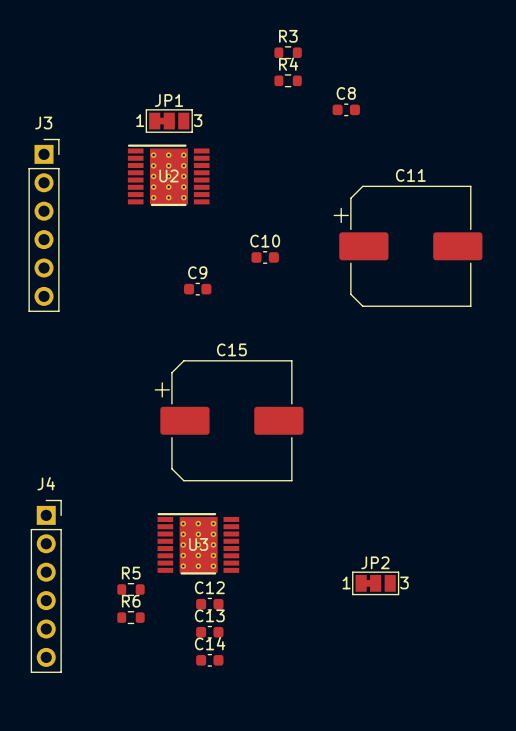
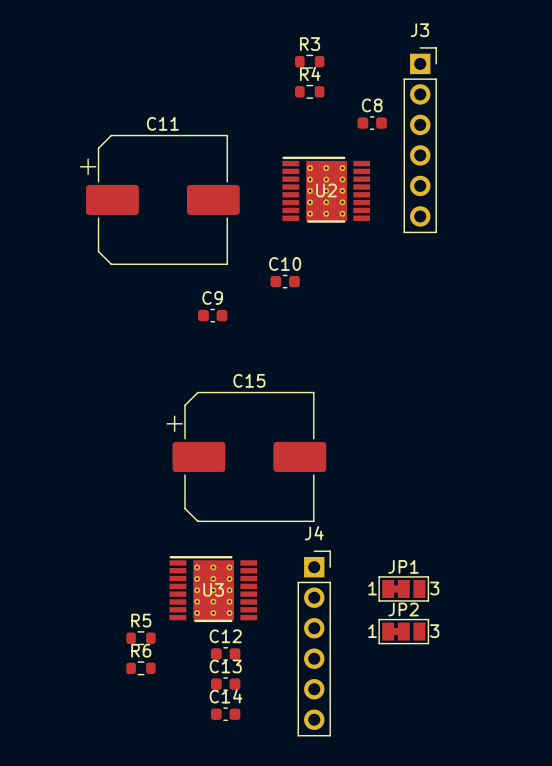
JP1 position: (169, 121) -> (403, 588)
U2 position: (168, 175) -> (326, 189)
J3 position: (44, 225) -> (420, 140)
C11 position: (407, 246) -> (159, 199)
J4 position: (46, 586) -> (314, 643)

